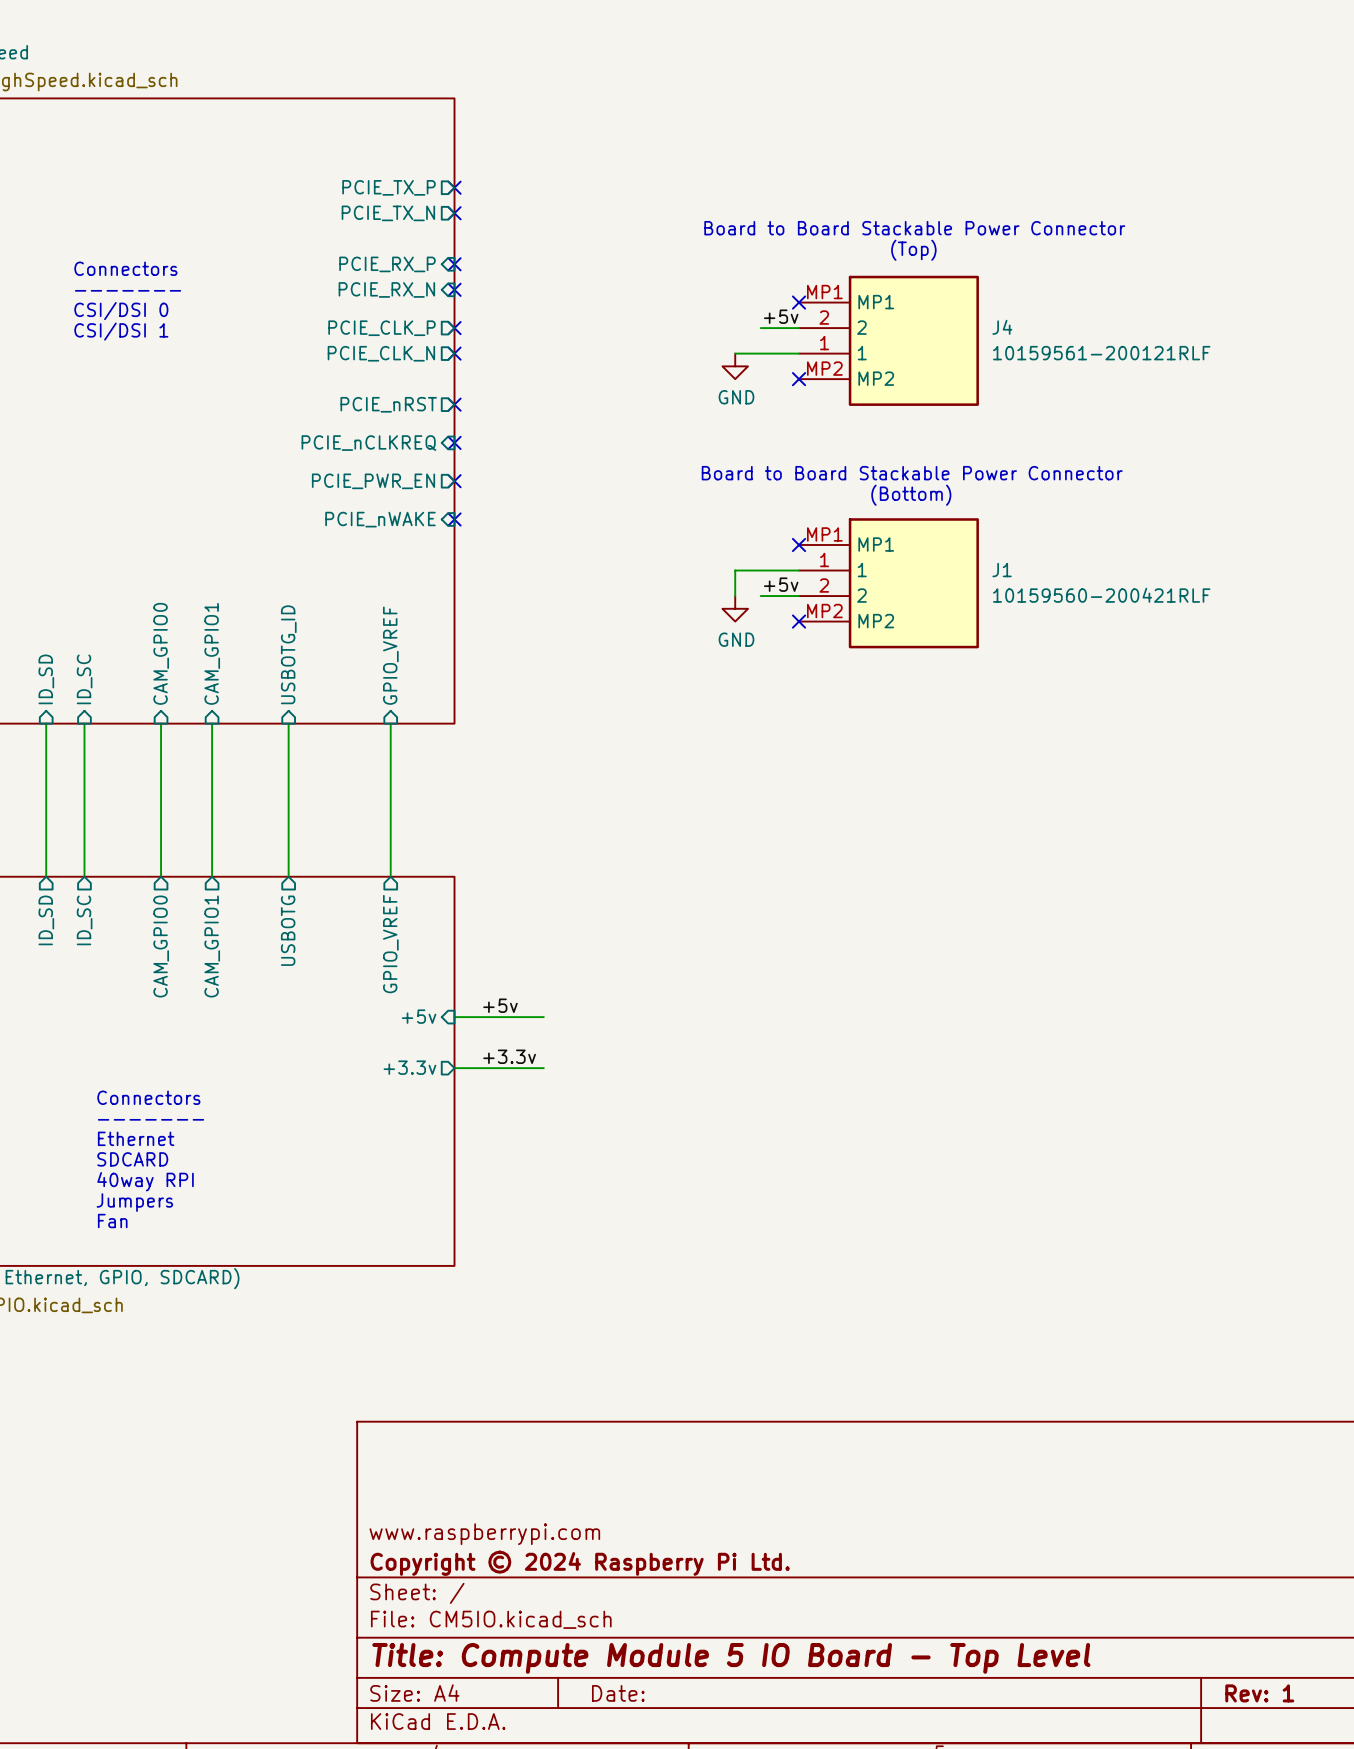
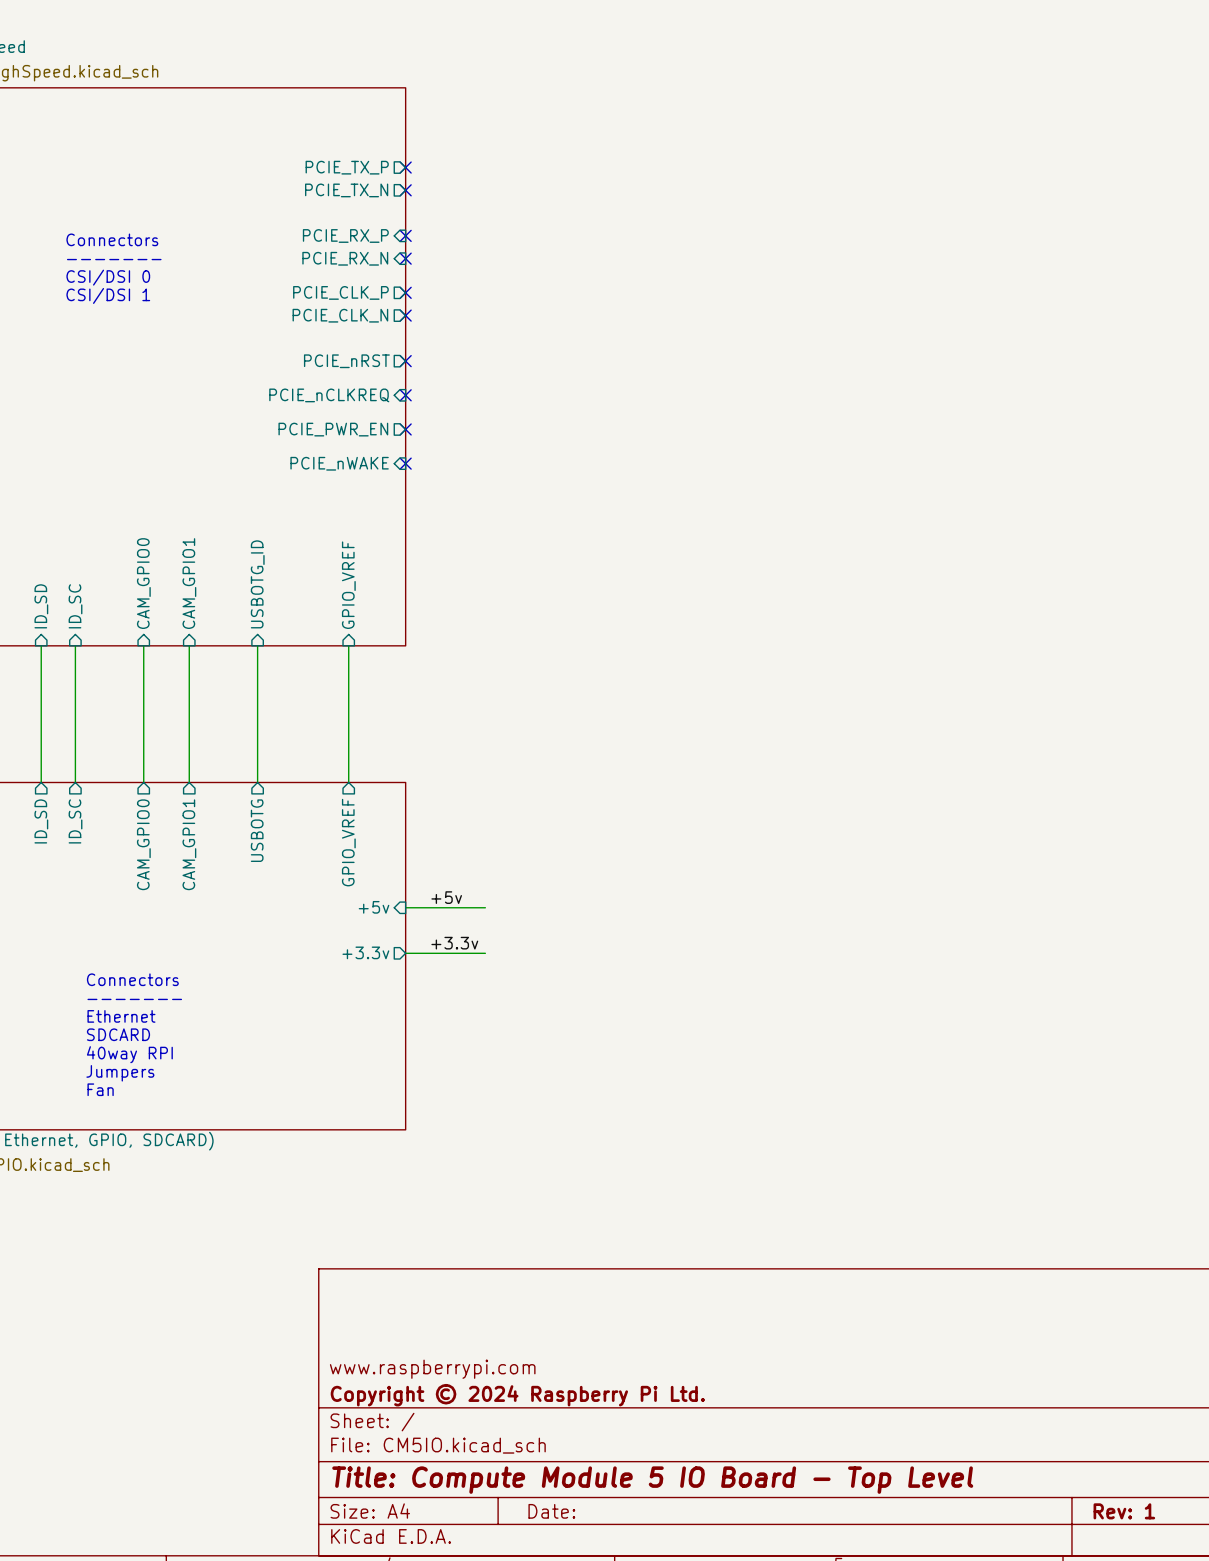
text: Board to Board Stackable Power Connector (914, 228) -> none
text: (Top) (913, 250) -> none
no-connect mark: (799, 302) -> none
label: +5v (781, 316) -> none
wire: (760, 328) (799, 328) -> none
J4: 10159561-200121RLF (888, 340) -> none
wire: (735, 353) (799, 353) -> none
power symbol: GND (735, 366) -> none
no-connect mark: (799, 379) -> none
text: Board to Board Stackable Power Connector (912, 473) -> none
text: (Bottom) (911, 495) -> none
no-connect mark: (799, 545) -> none
wire: (799, 570) (735, 570) (735, 596) -> none
J1: 10159560-200421RLF (888, 583) -> none
label: +5v (781, 584) -> none
wire: (760, 596) (799, 596) -> none
power symbol: GND (735, 608) -> none
no-connect mark: (799, 621) -> none

